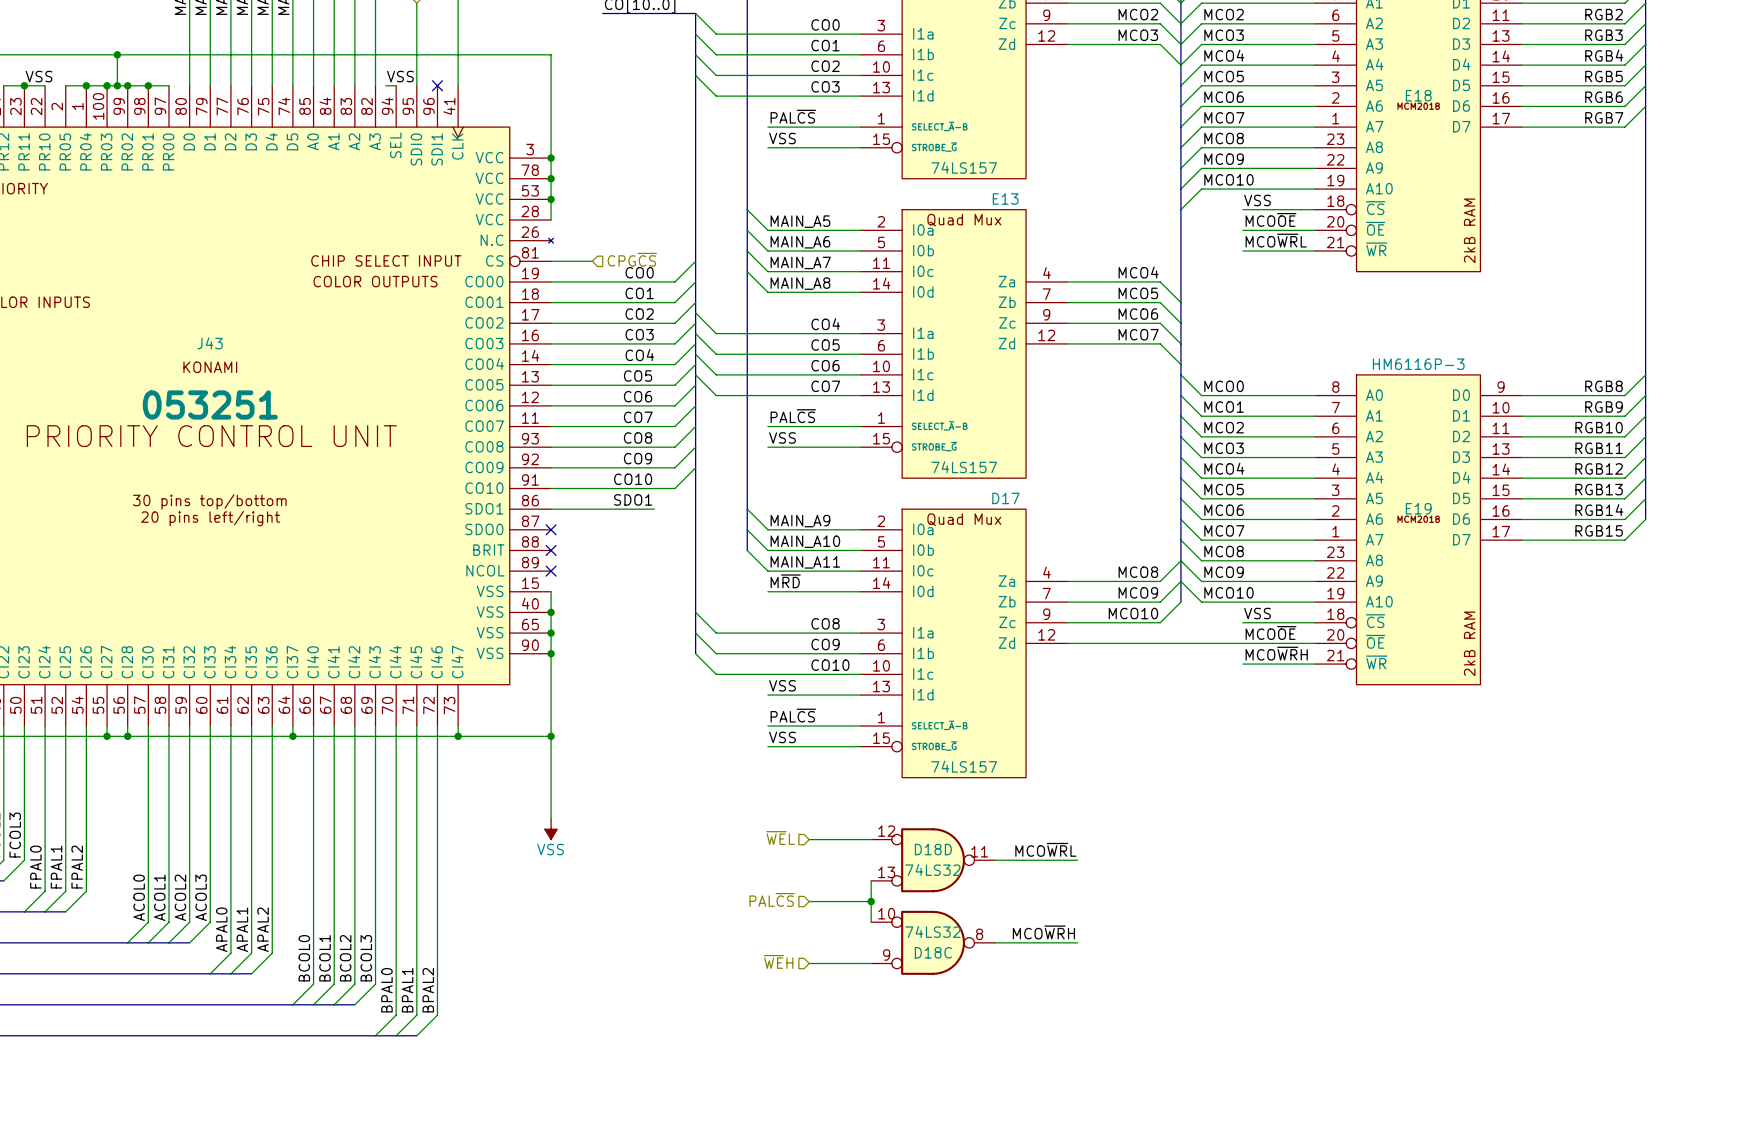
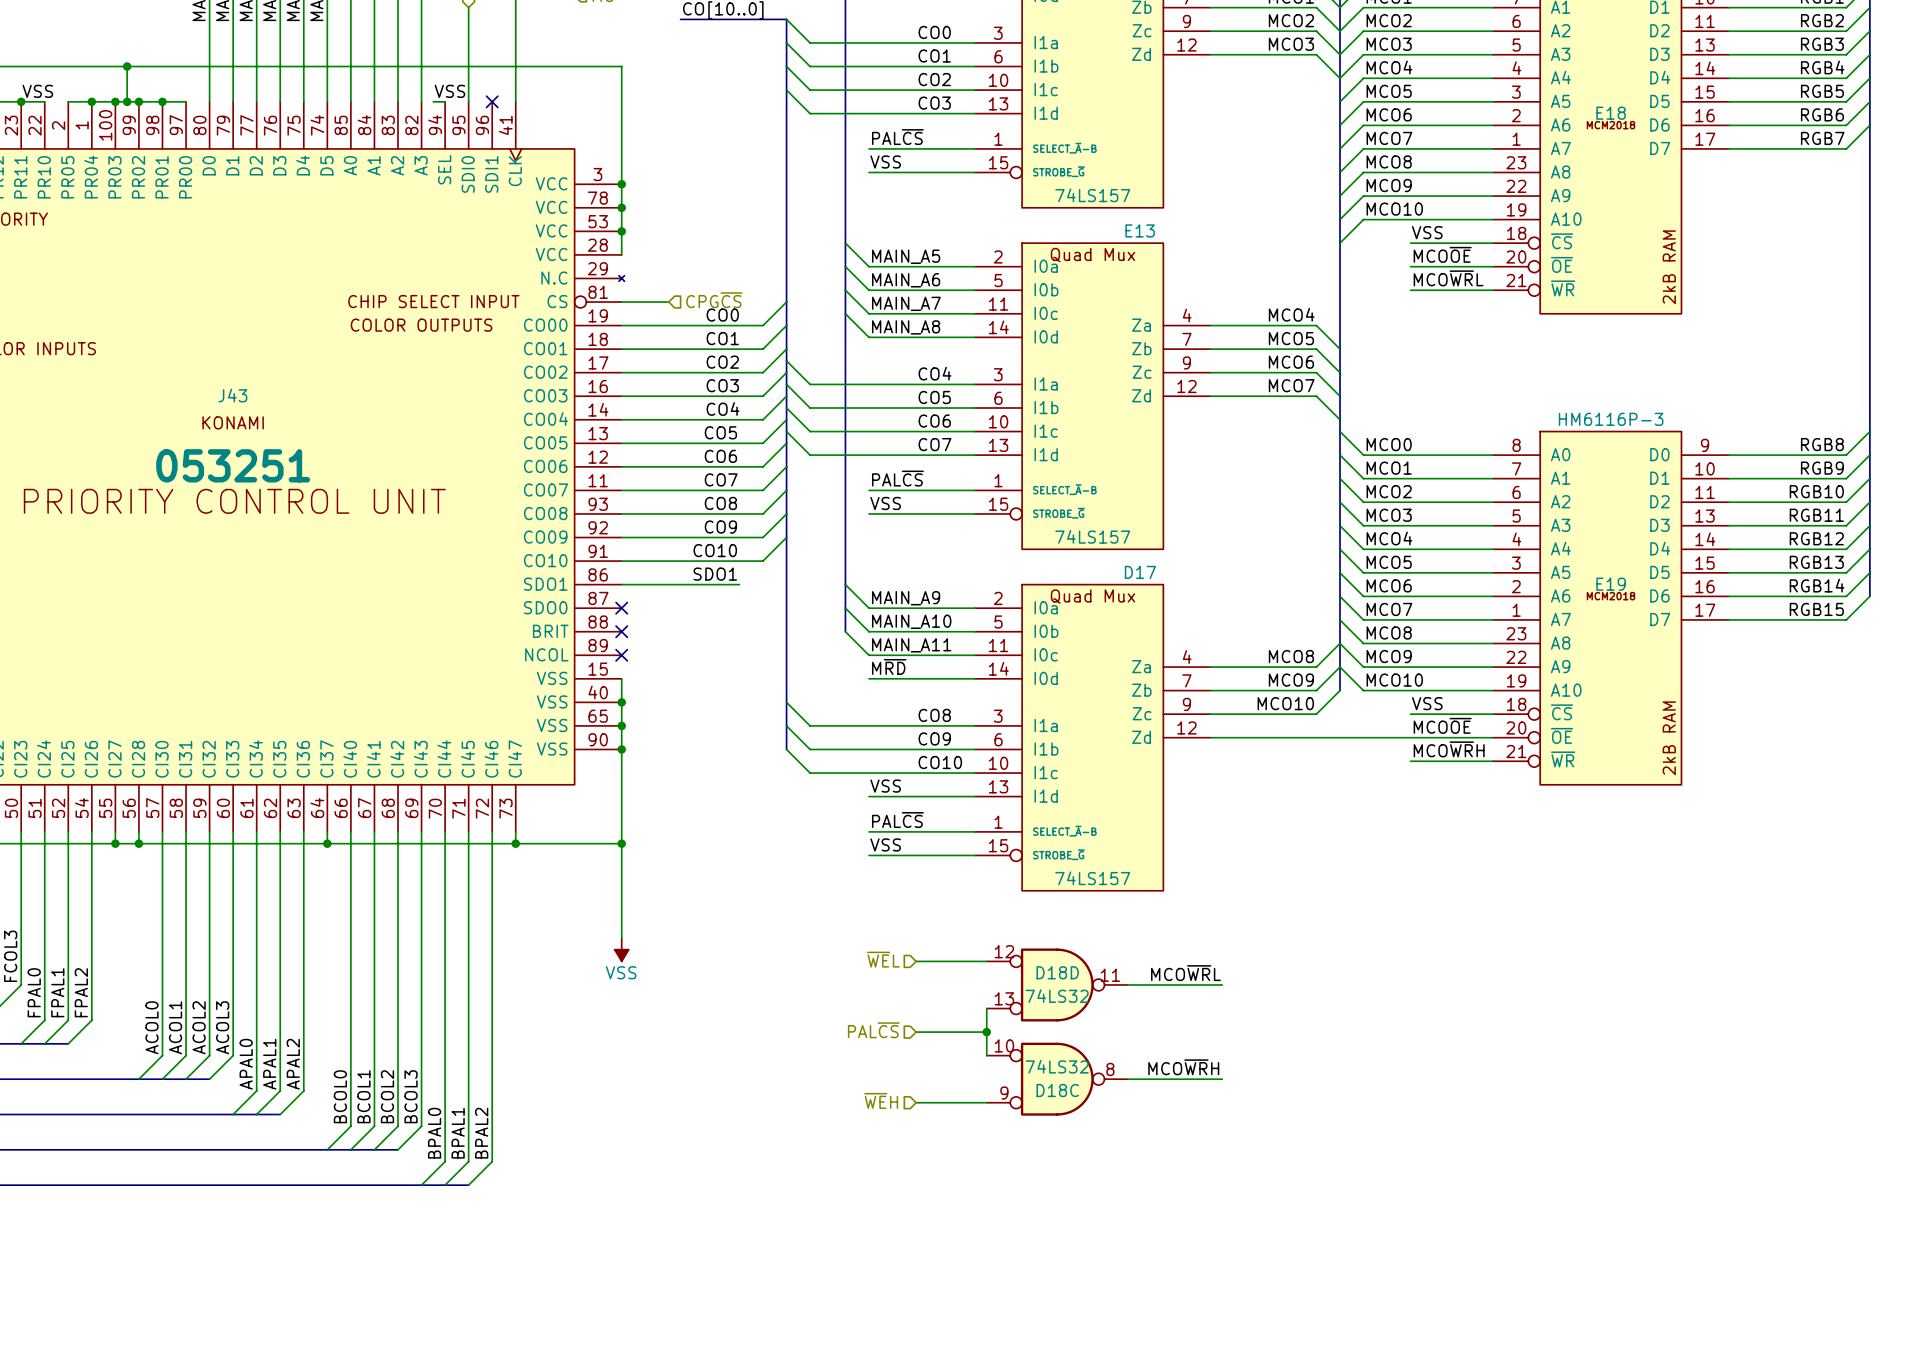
J43 pin number: 26 (530, 232) -> 29 (597, 268)
J43 text: 30 pins top/bottom (209, 501) -> none
J43 text: 20 pins left/right (210, 518) -> none

